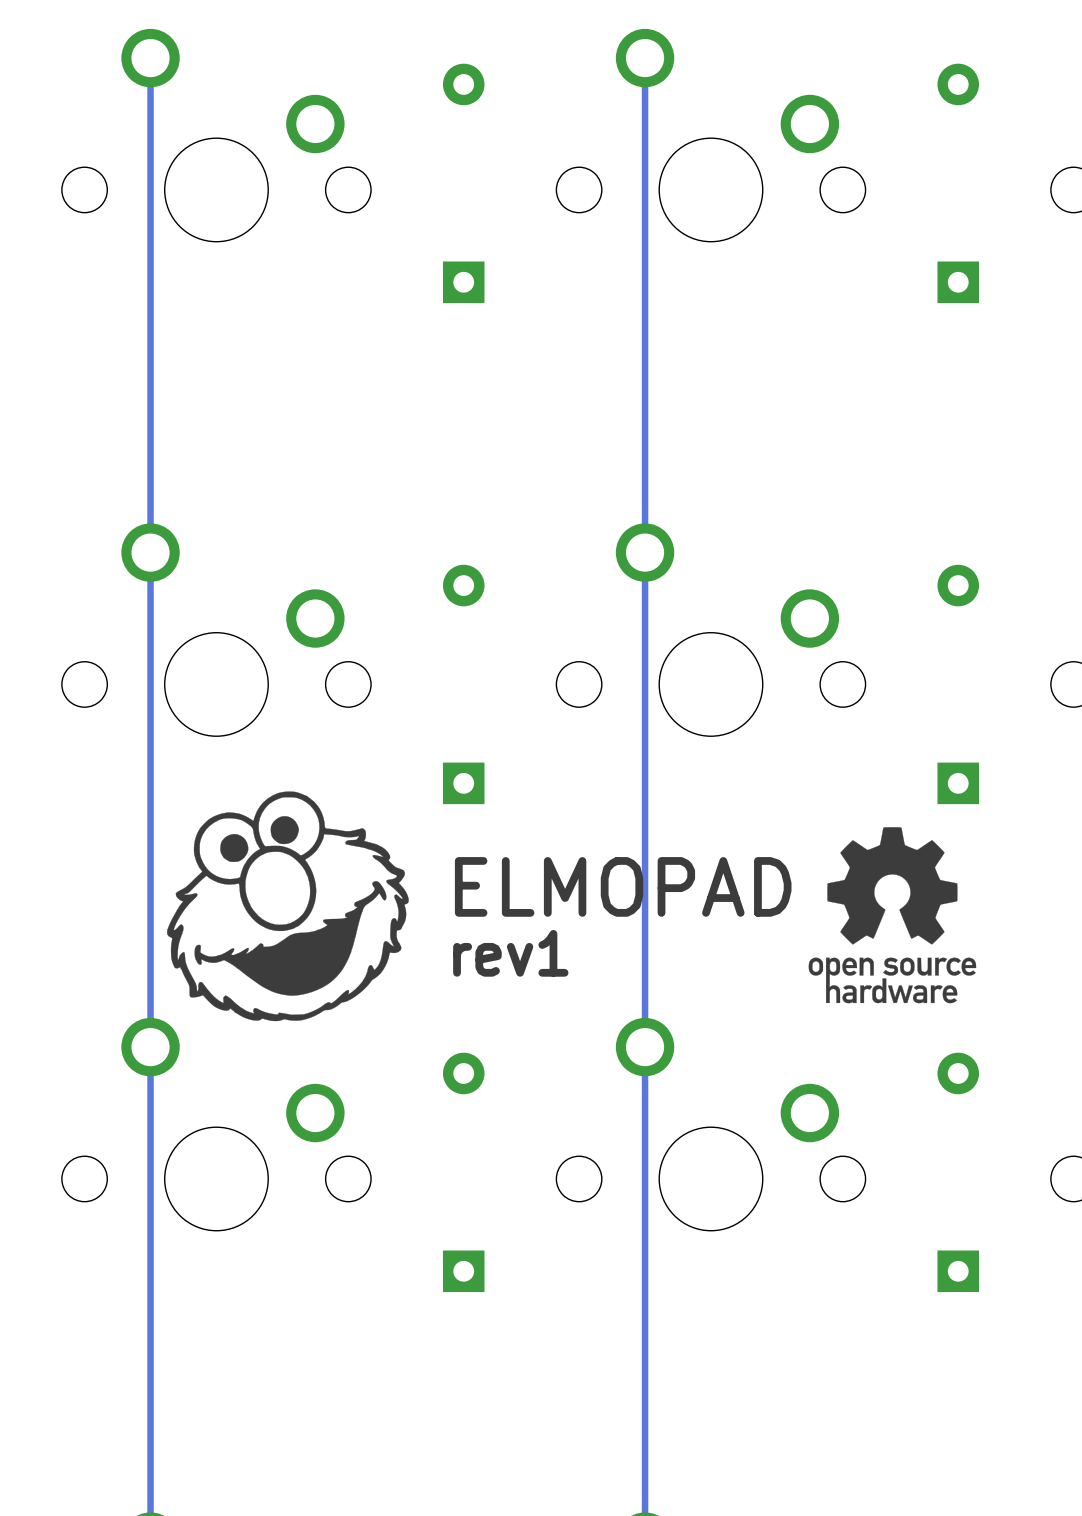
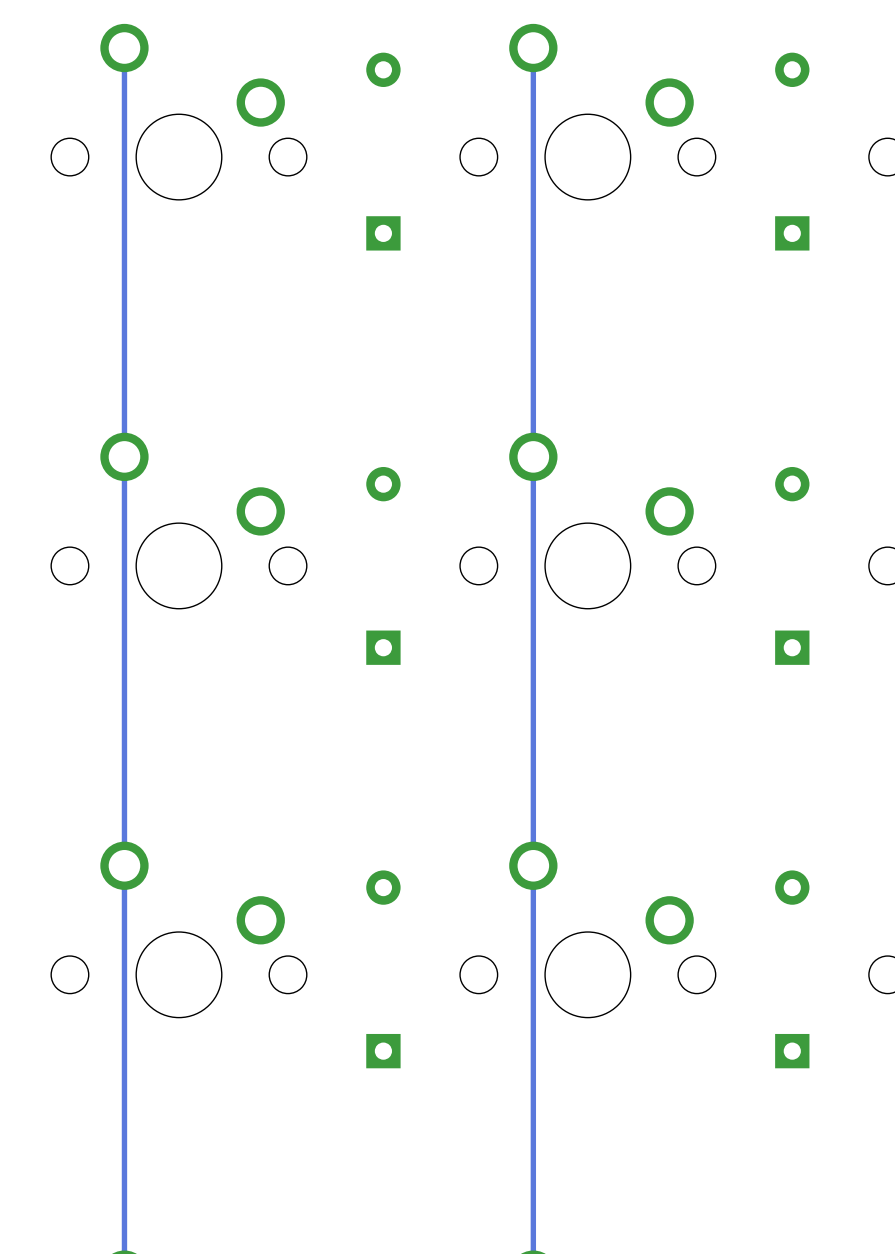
drawing: [166, 791, 409, 1022] -> none
drawing: [808, 827, 977, 1004] -> none
text: ELMOPAD (623, 886) -> none
text: rev1 (510, 953) -> none

